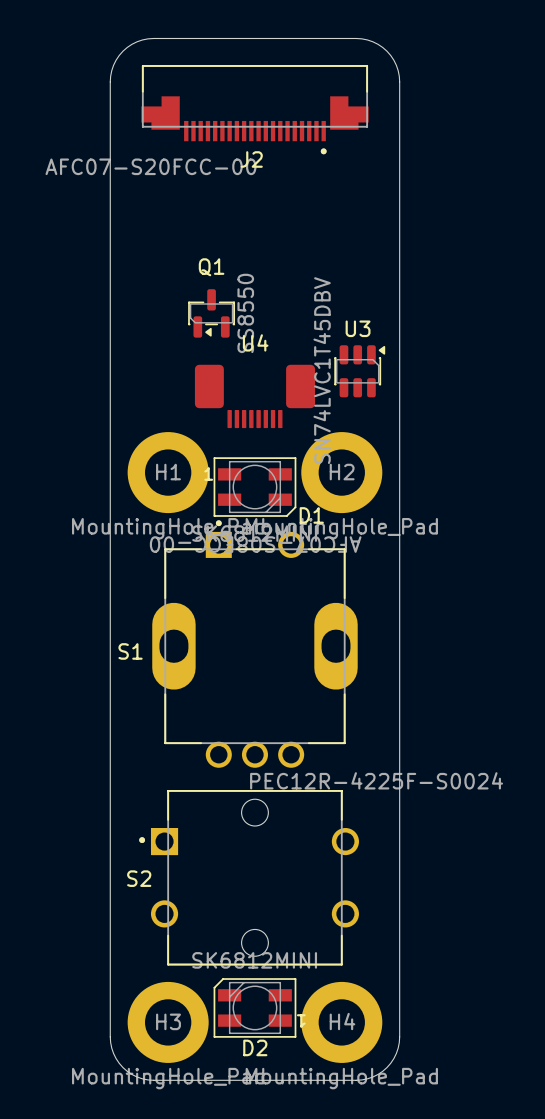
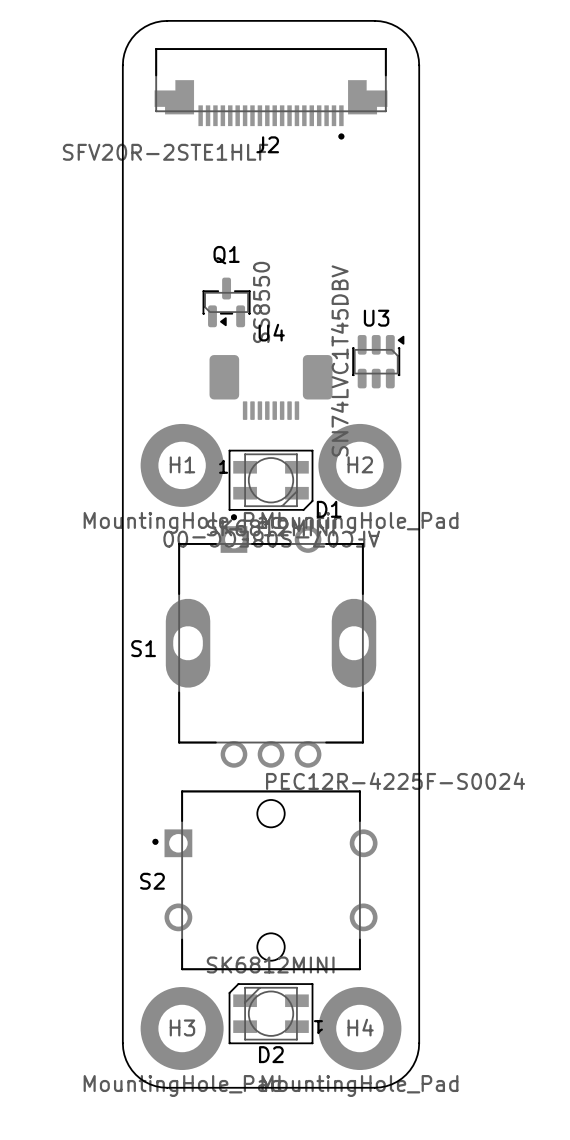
J2 value: AFC07-S20FCC-00 (150, 166) -> SFV20R-2STE1HLF (165, 152)

